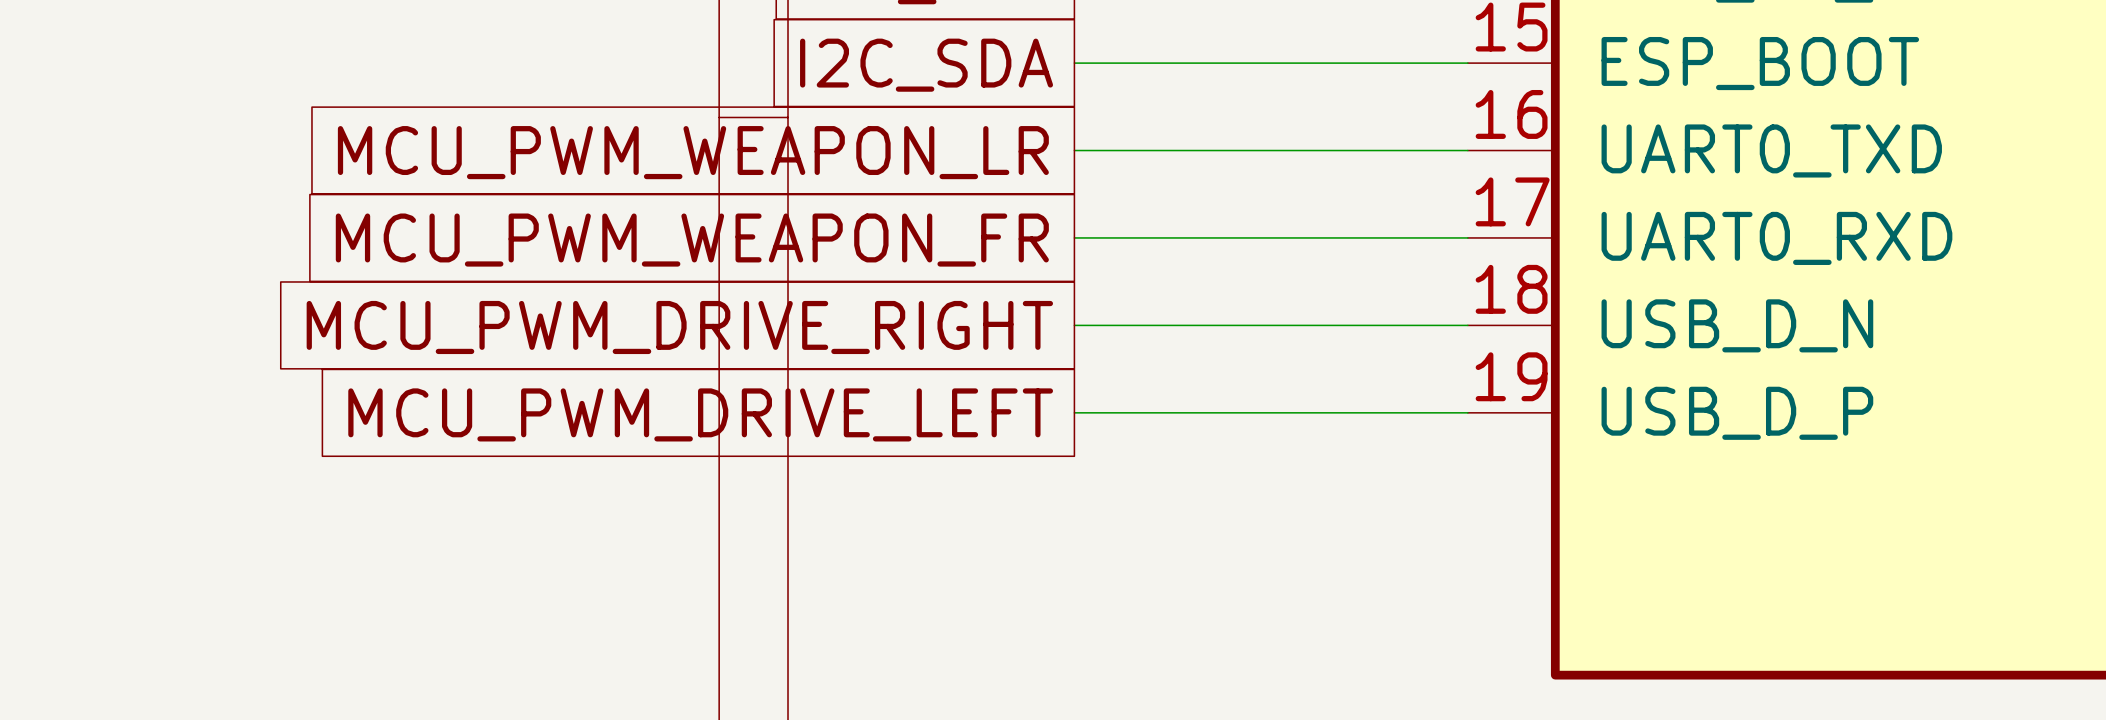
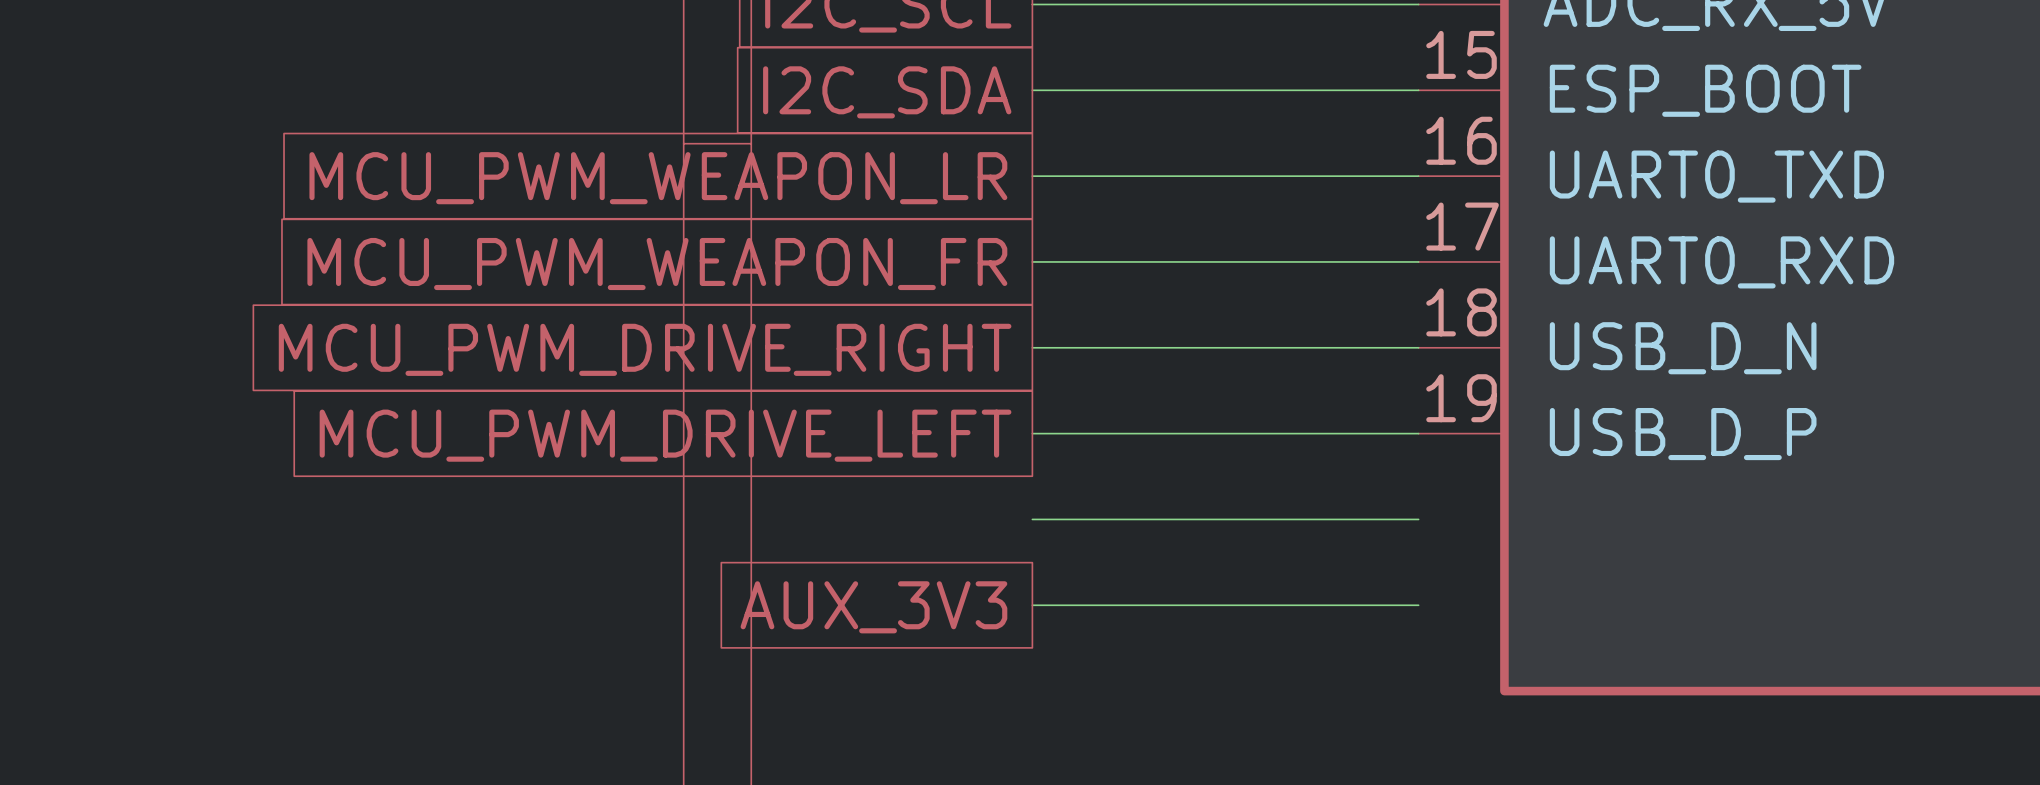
wire: none -> (1032, 519) (1418, 519)
wire: none -> (1032, 605) (1418, 605)
global label: none -> AUX_3V3 (873, 607)

